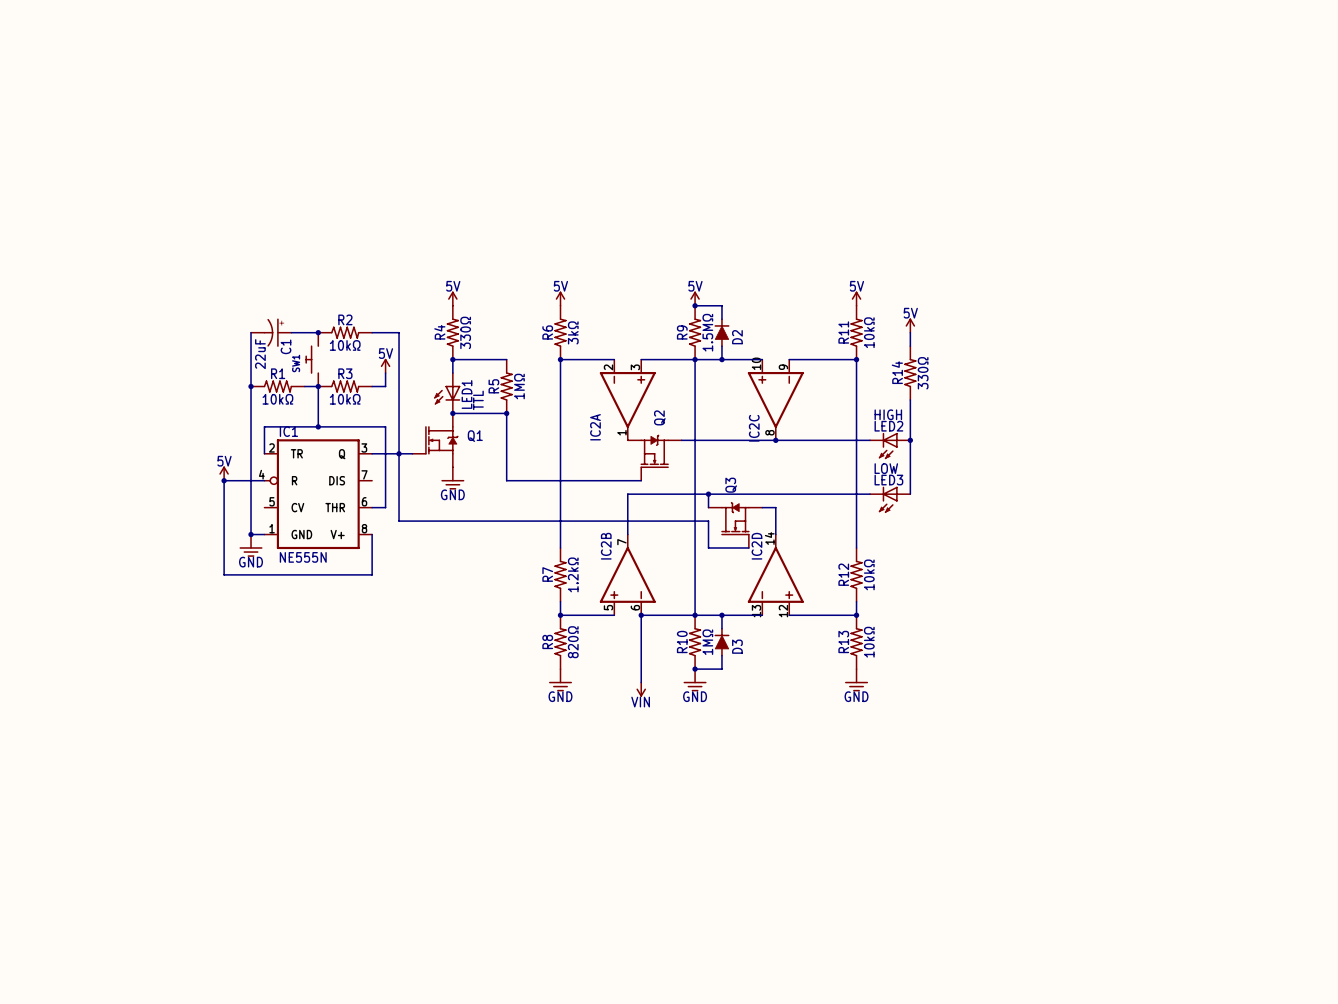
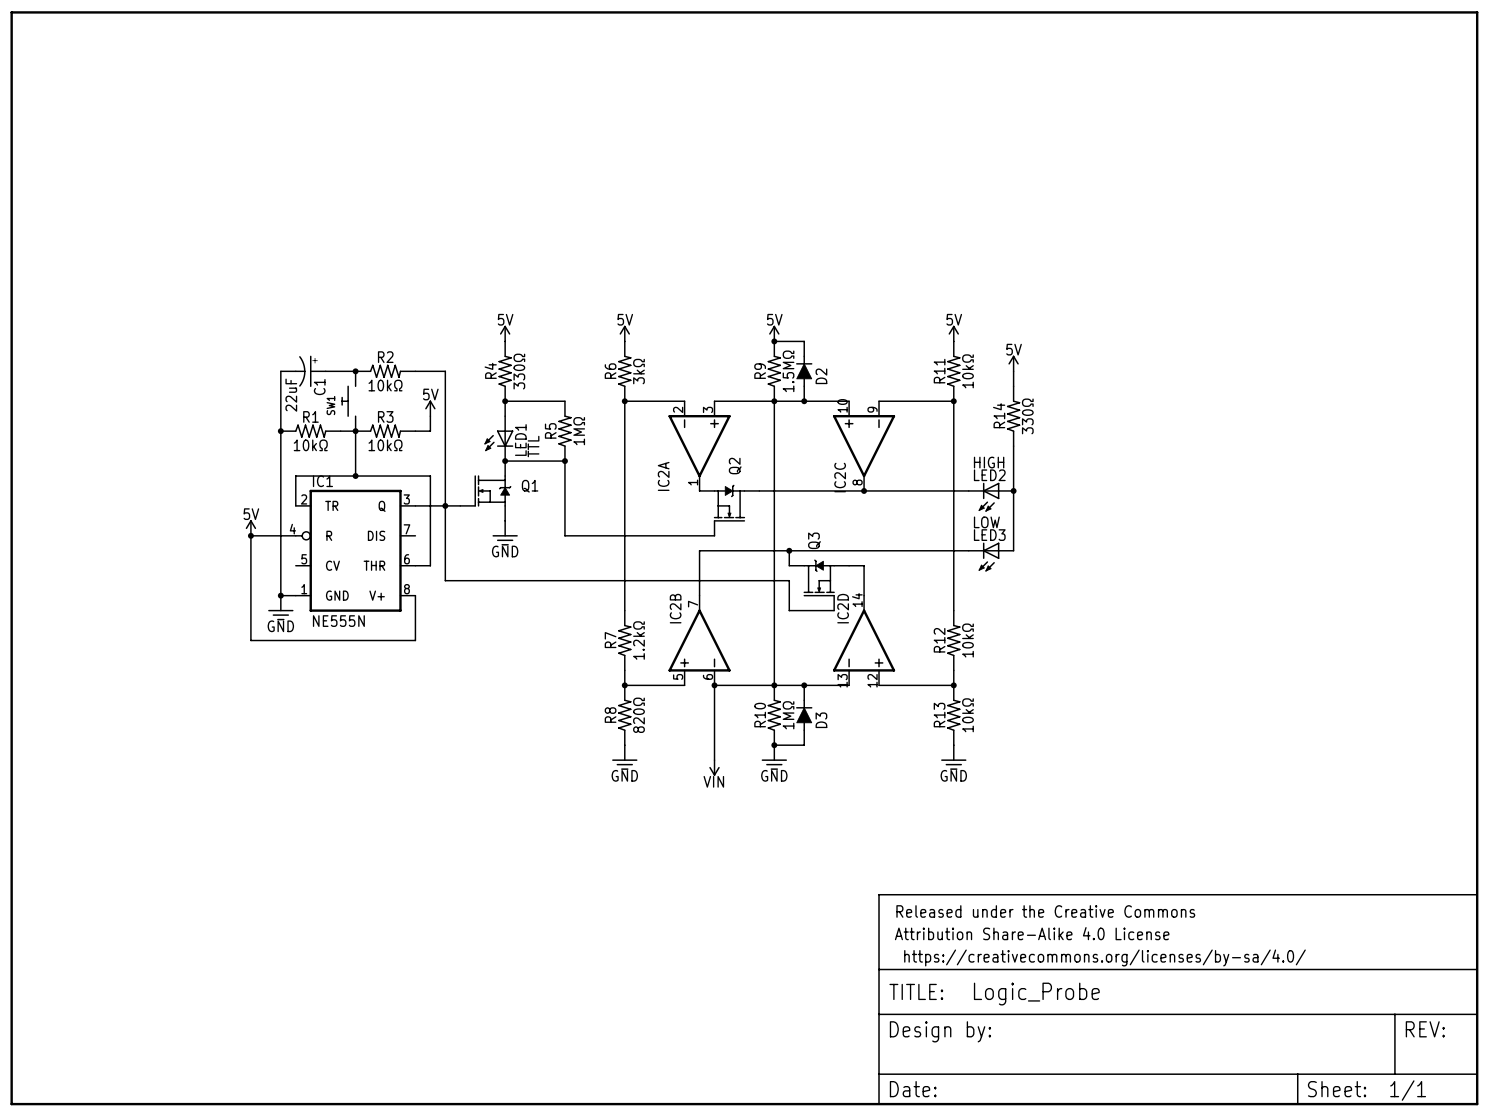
part: none -> (744, 558)
part: none -> (1178, 999)

